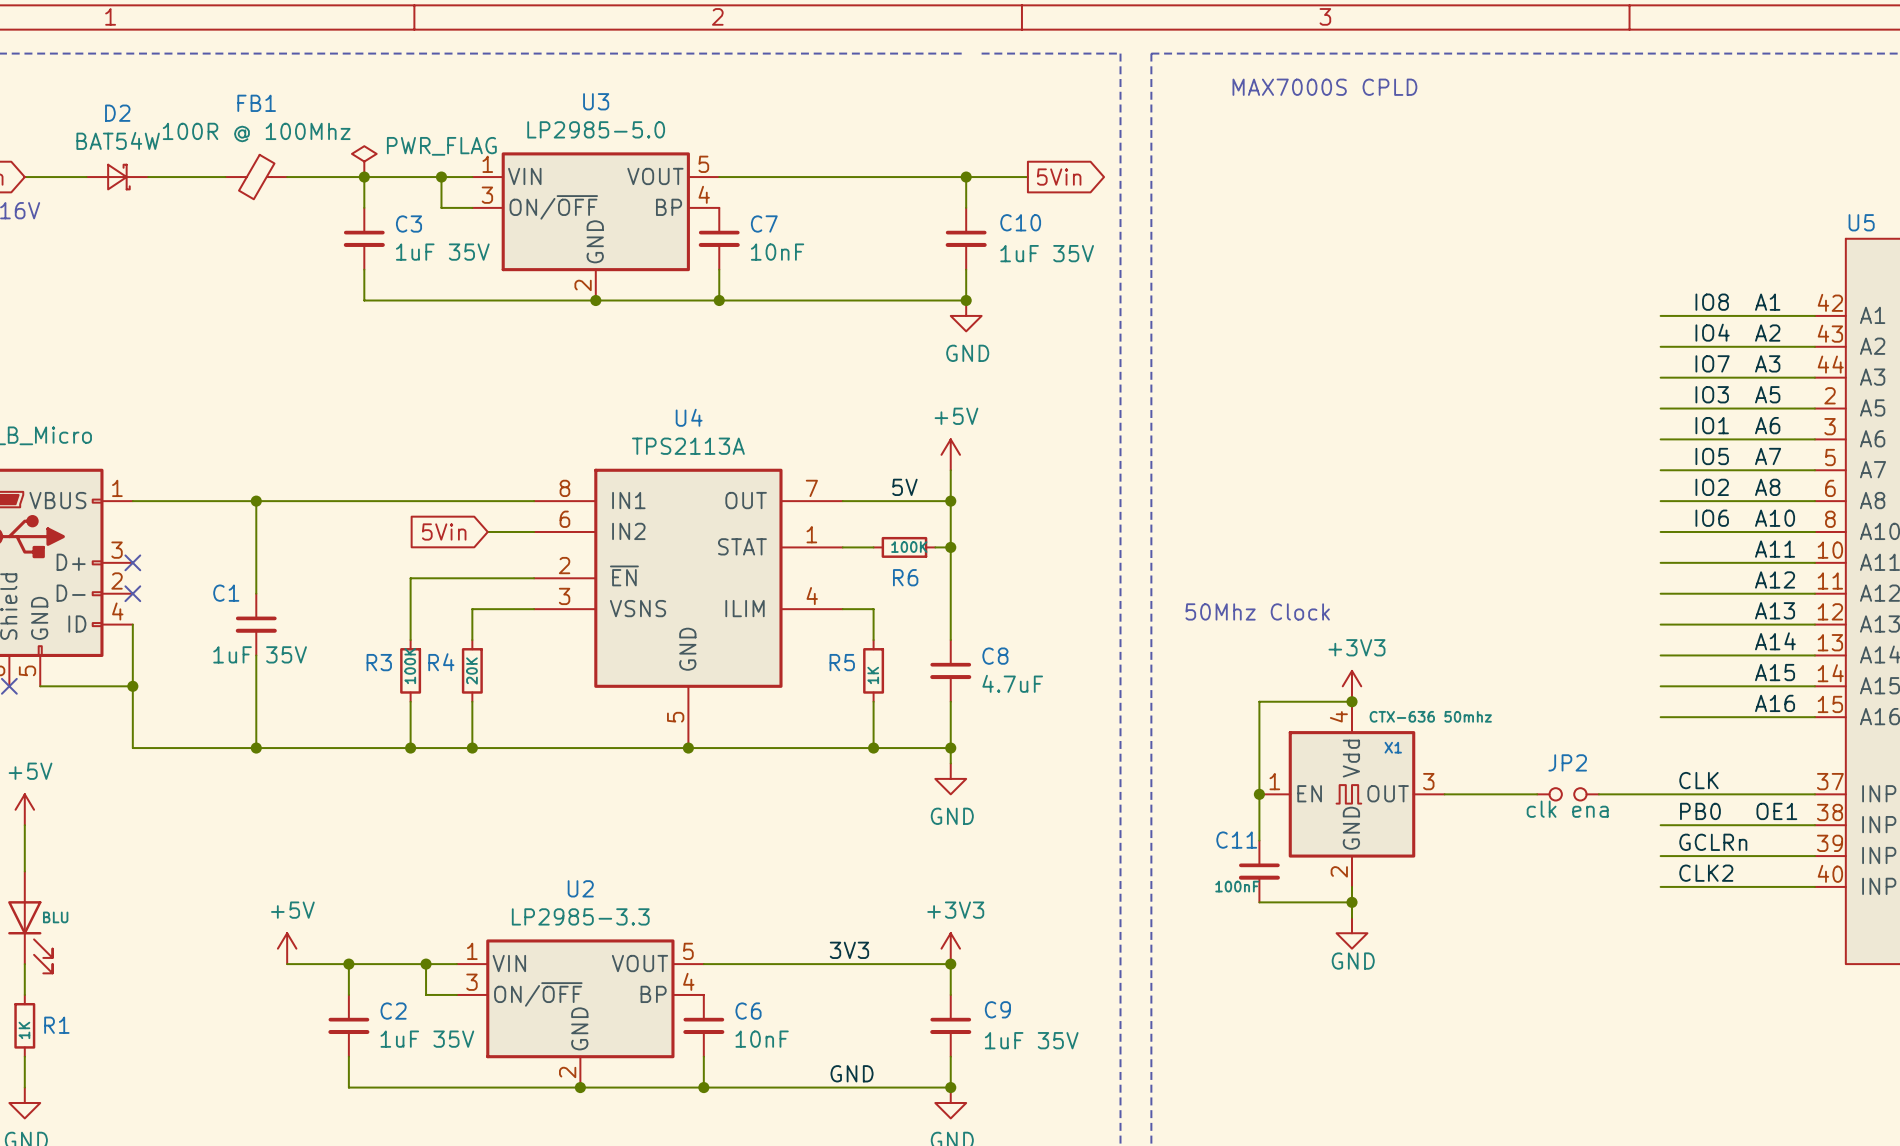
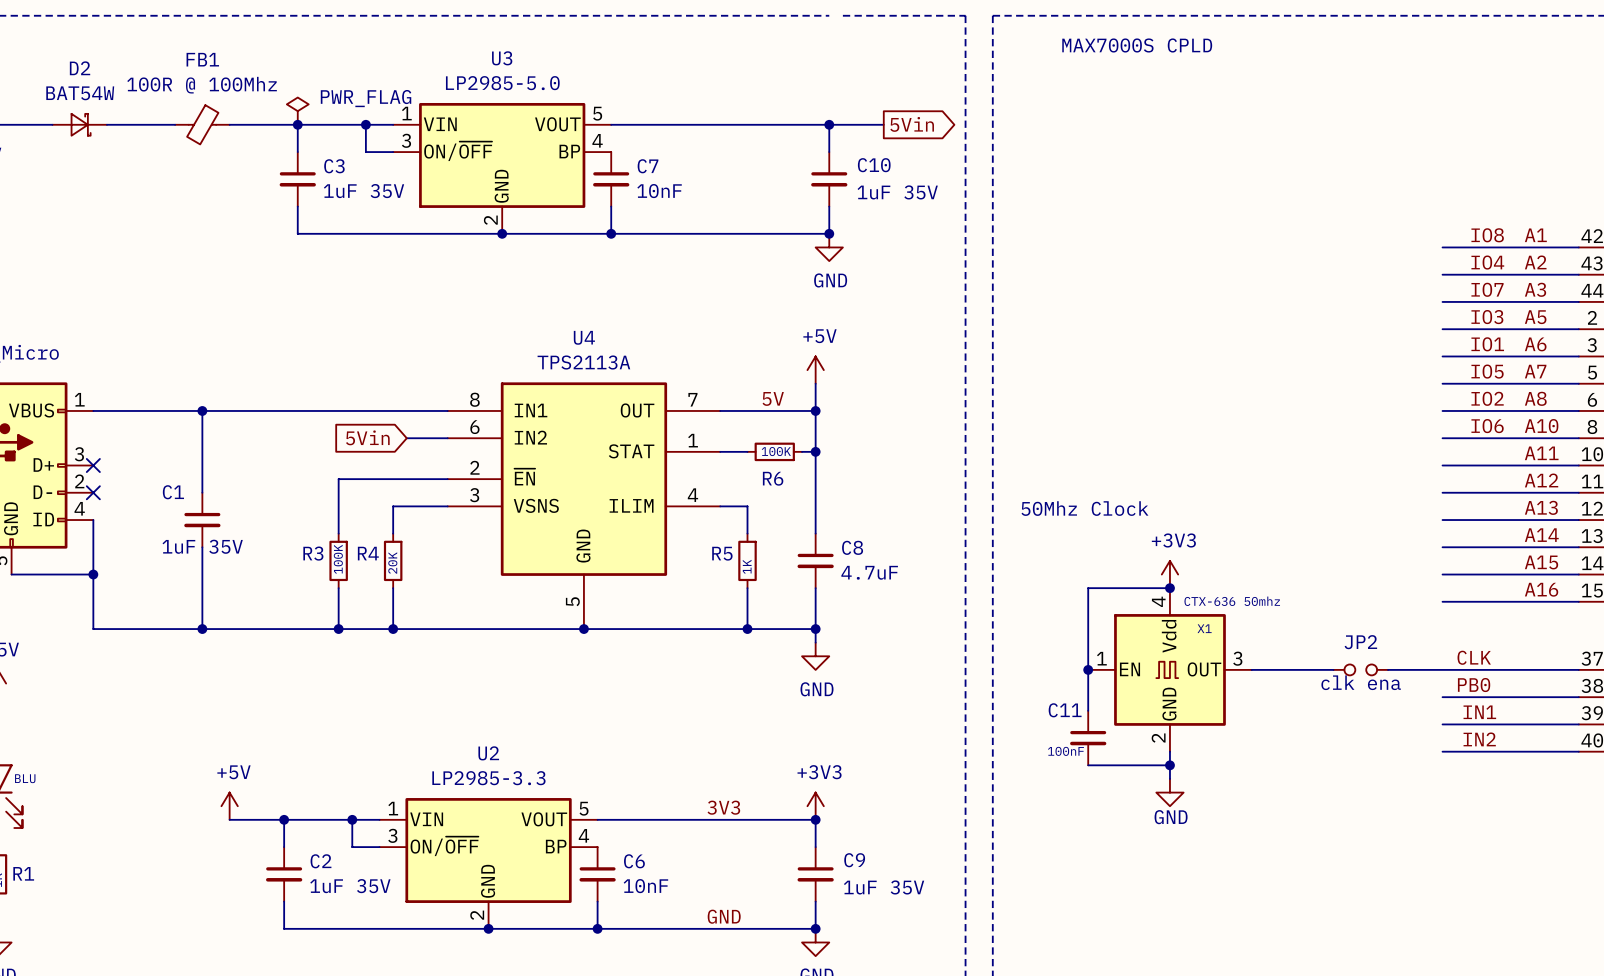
label: OE1 (1776, 811) -> none
label: none -> IN1 (1479, 712)
label: GCLRn (1713, 842) -> none
label: none -> IN2 (1479, 739)
label: CLK2 (1706, 873) -> none

